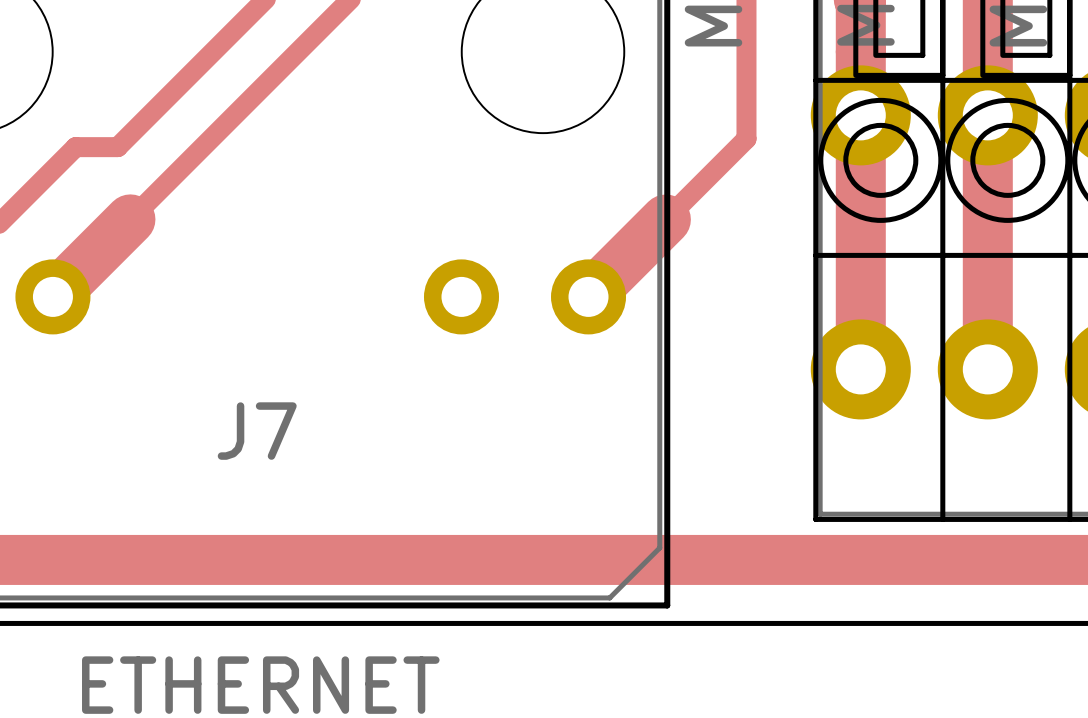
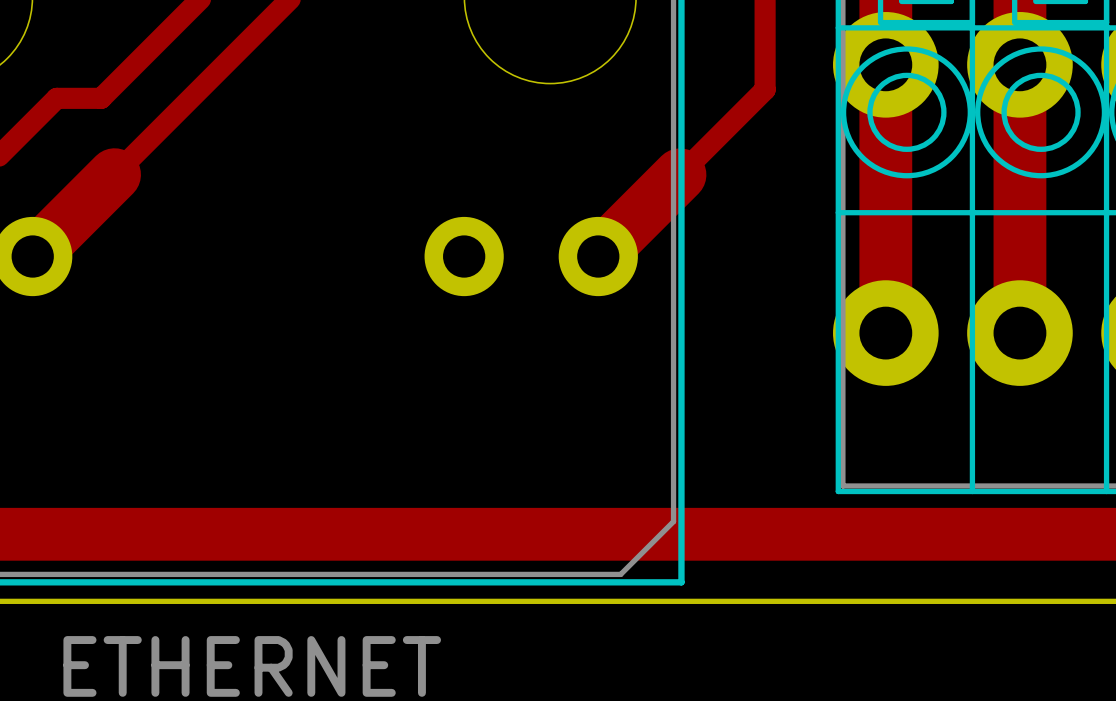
J7 name: J7 (257, 431) -> none

